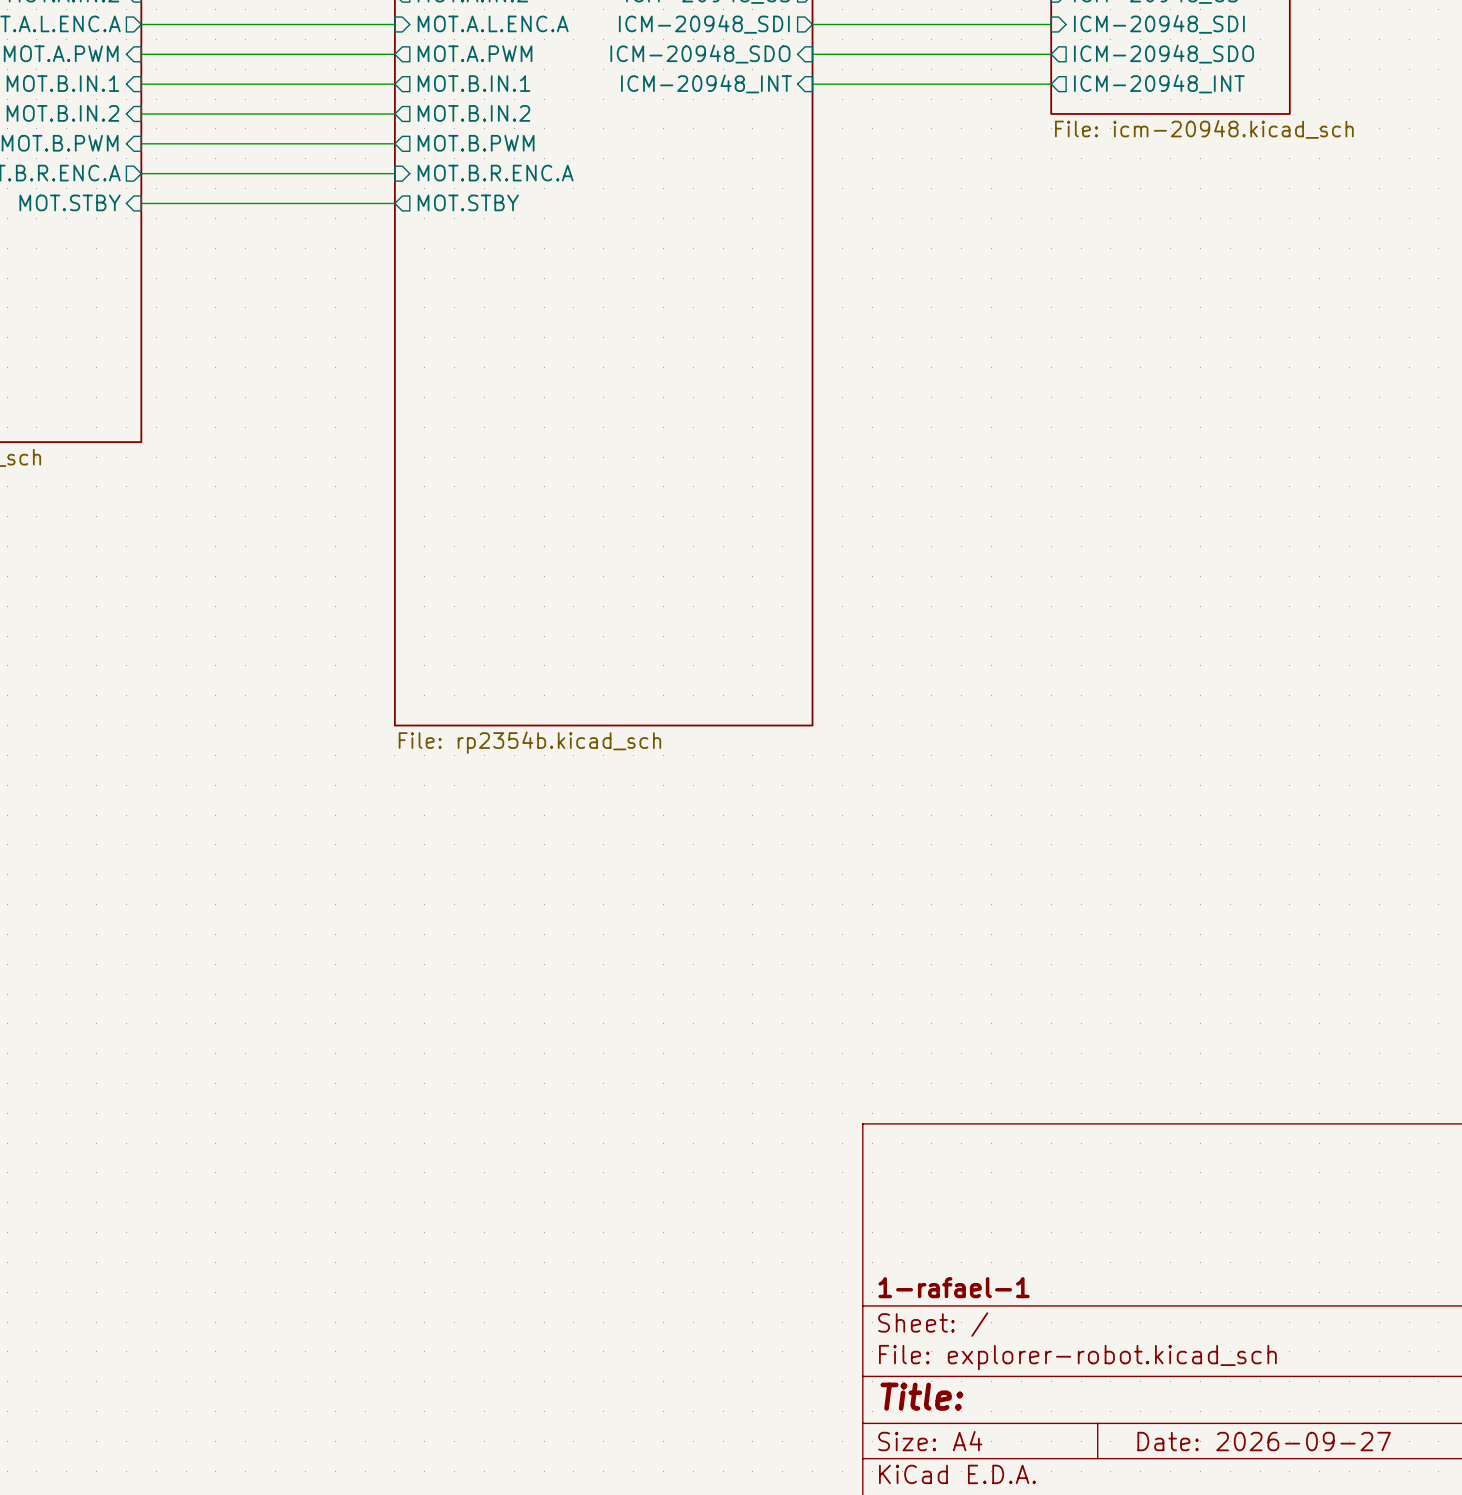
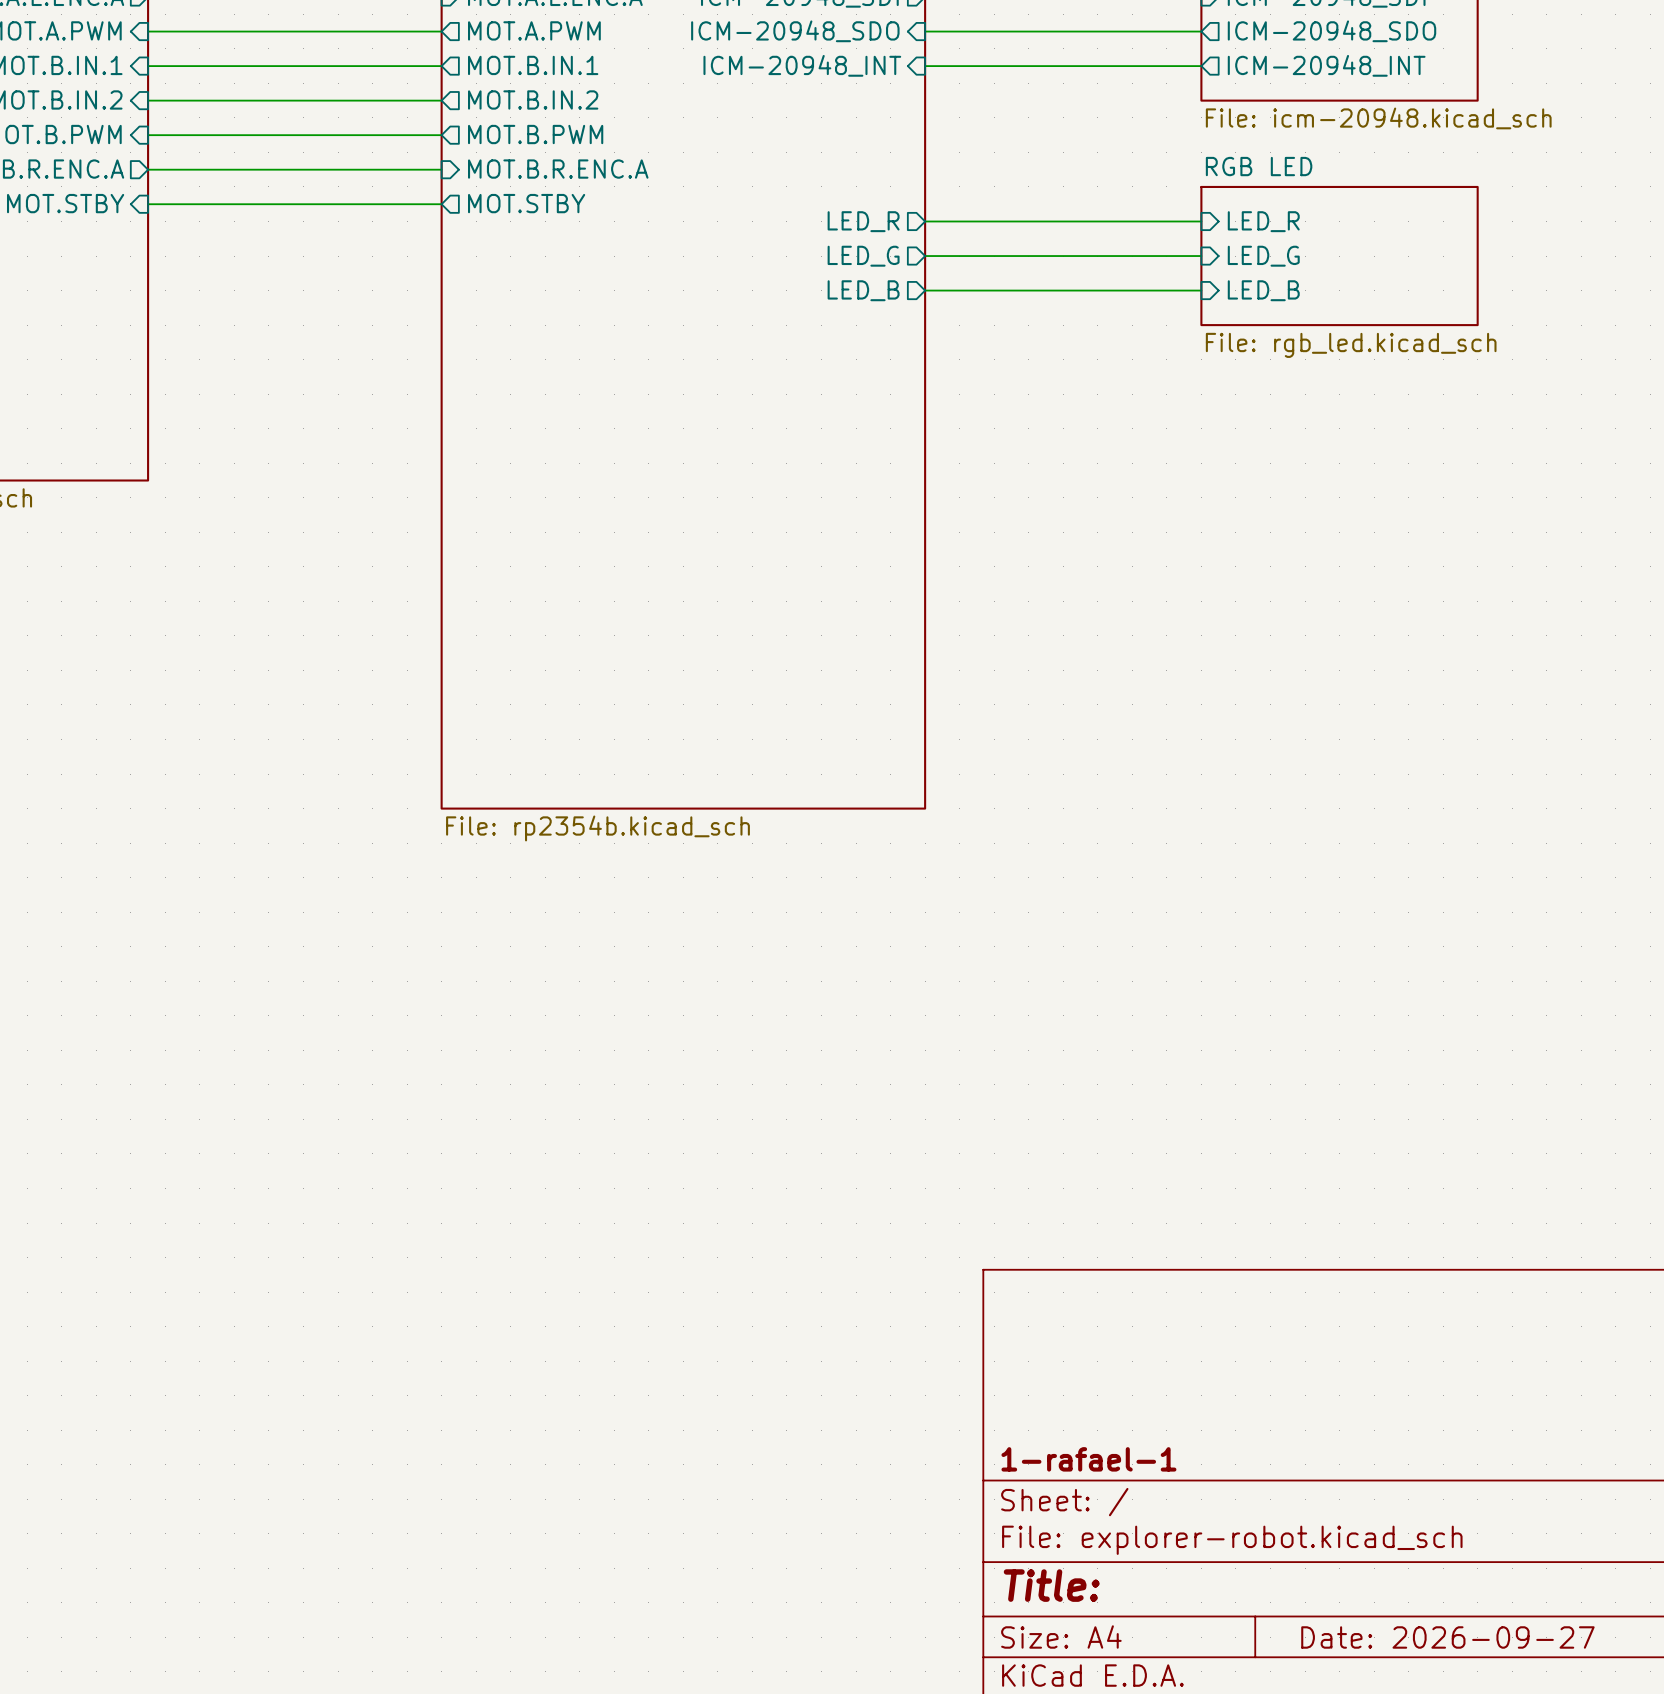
sheet pin: none -> LED_R (863, 221)
wire: none -> (925, 221) (1201, 221)
sheet pin: none -> LED_R (1263, 221)
sheet pin: none -> LED_G (863, 256)
wire: none -> (925, 256) (1201, 256)
sheet pin: none -> LED_G (1263, 256)
sheet RGB LED: none -> File: rgb_led.kicad_sch (1339, 256)
sheet pin: none -> LED_B (863, 290)
wire: none -> (925, 290) (1201, 290)
sheet pin: none -> LED_B (1263, 290)

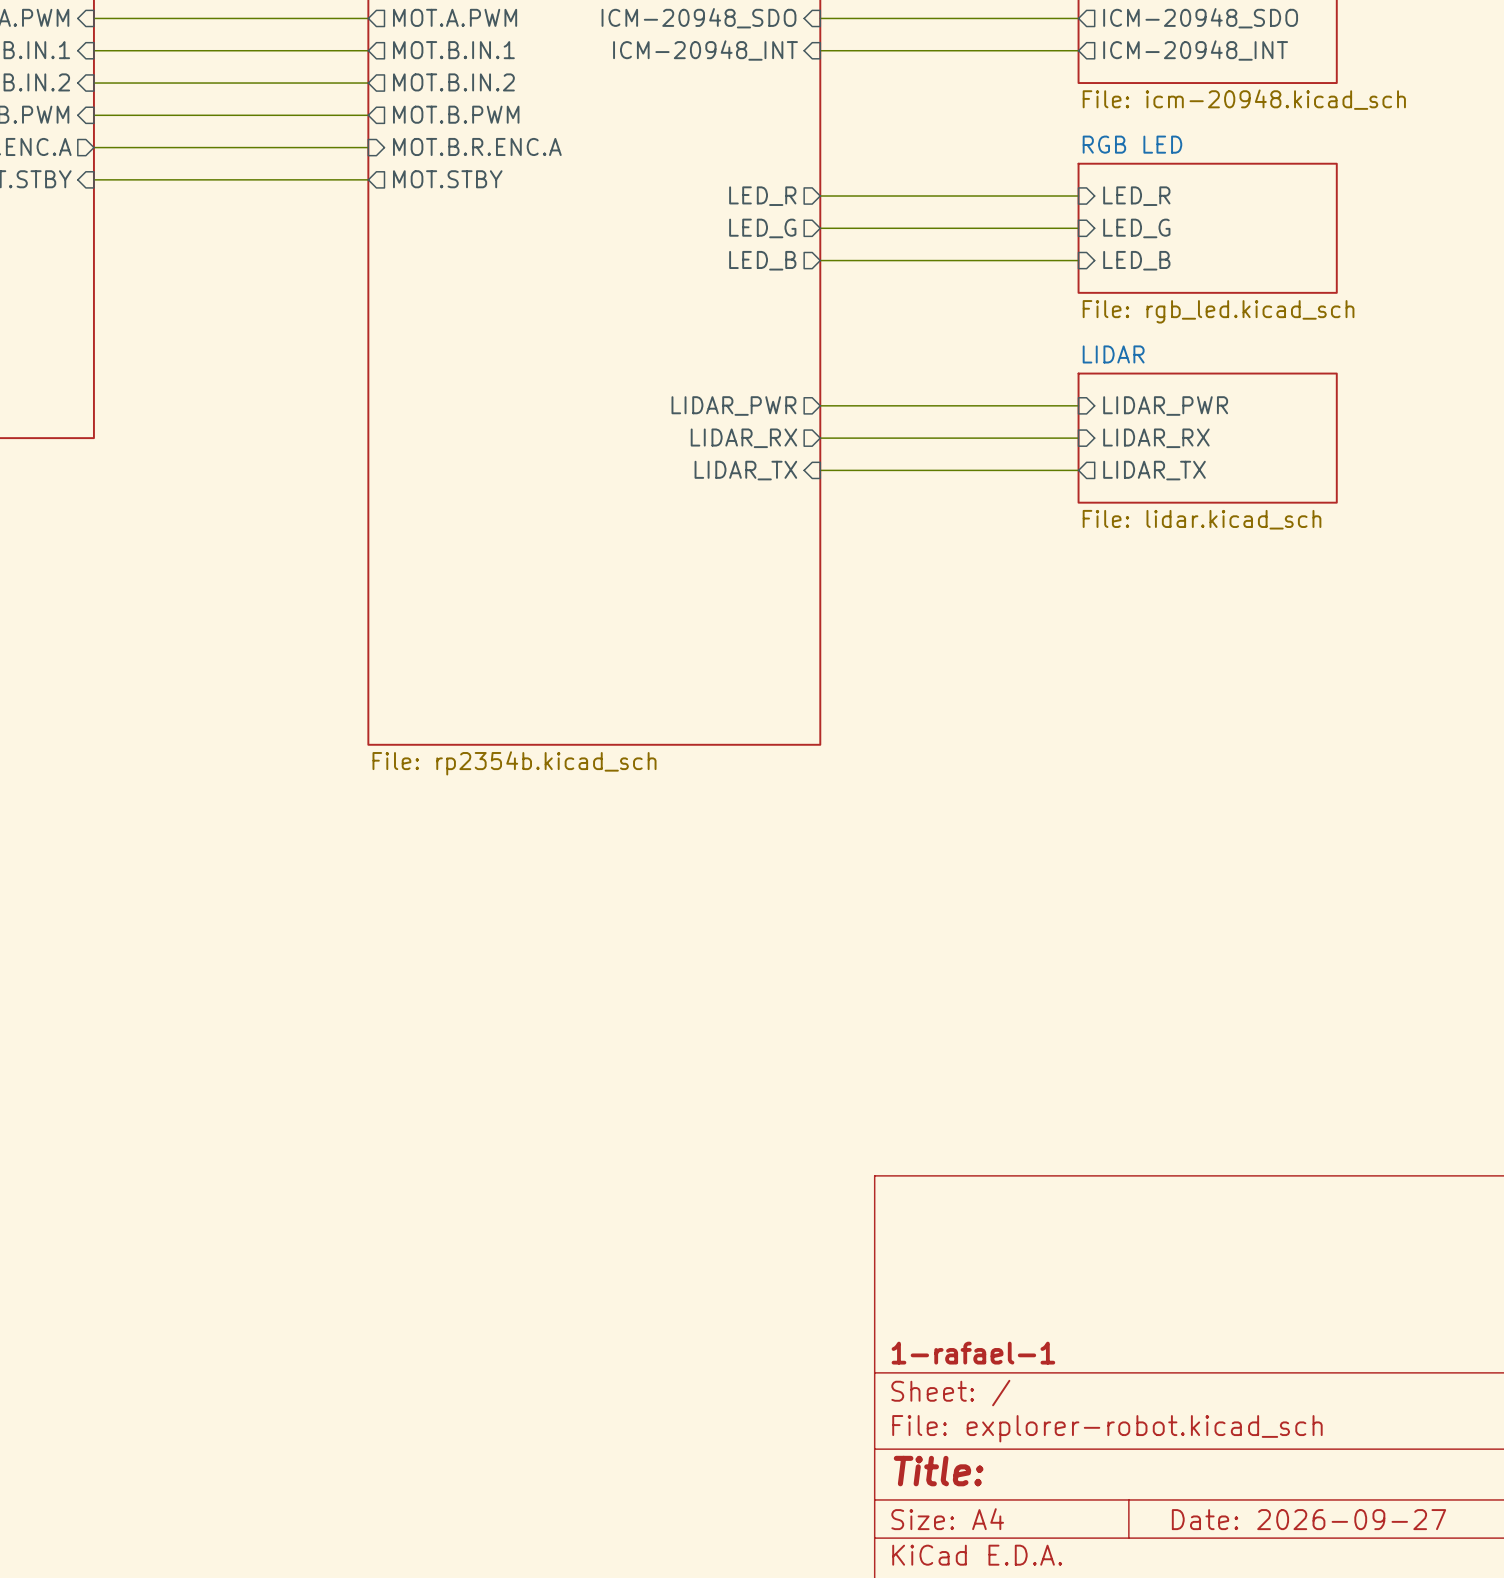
wire: none -> (820, 405) (1078, 405)
sheet pin: none -> LIDAR_PWR (733, 406)
sheet pin: none -> LIDAR_PWR (1165, 406)
sheet pin: none -> LIDAR_RX (743, 438)
wire: none -> (820, 438) (1078, 438)
sheet pin: none -> LIDAR_RX (1156, 438)
sheet LIDAR: none -> File: lidar.kicad_sch (1207, 438)
sheet pin: none -> LIDAR_TX (745, 470)
wire: none -> (820, 470) (1078, 470)
sheet pin: none -> LIDAR_TX (1154, 470)

